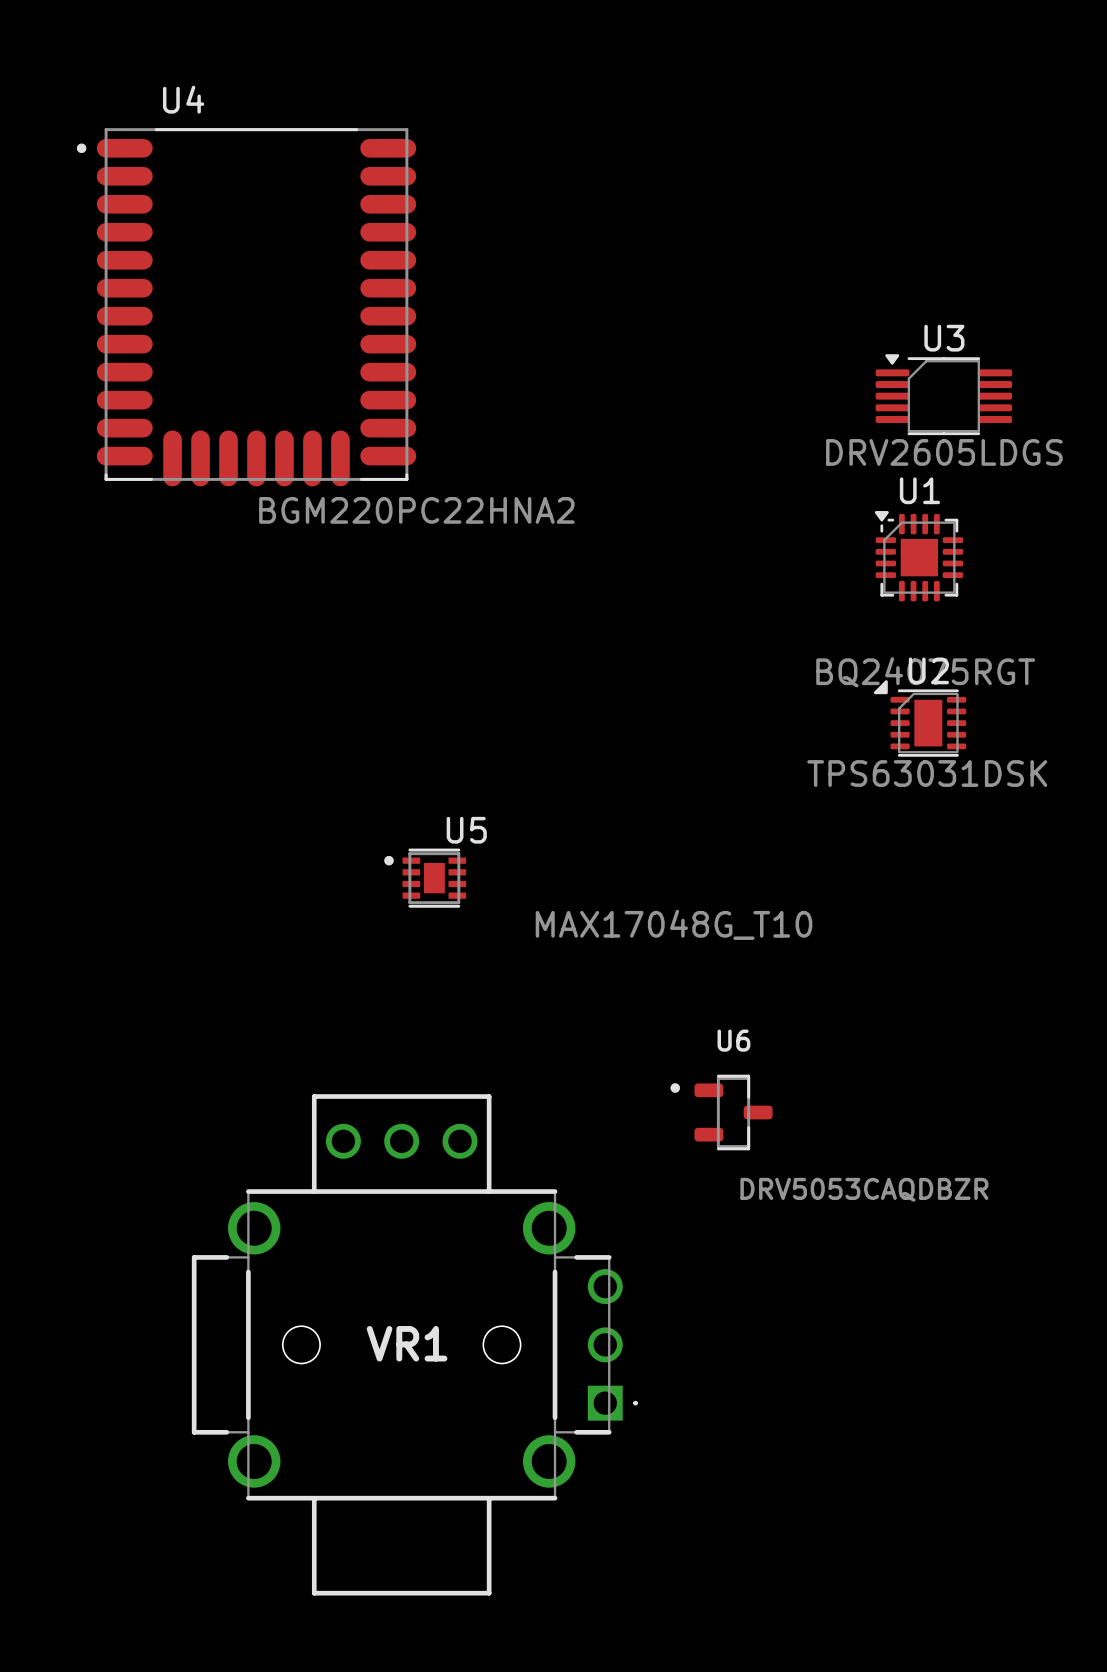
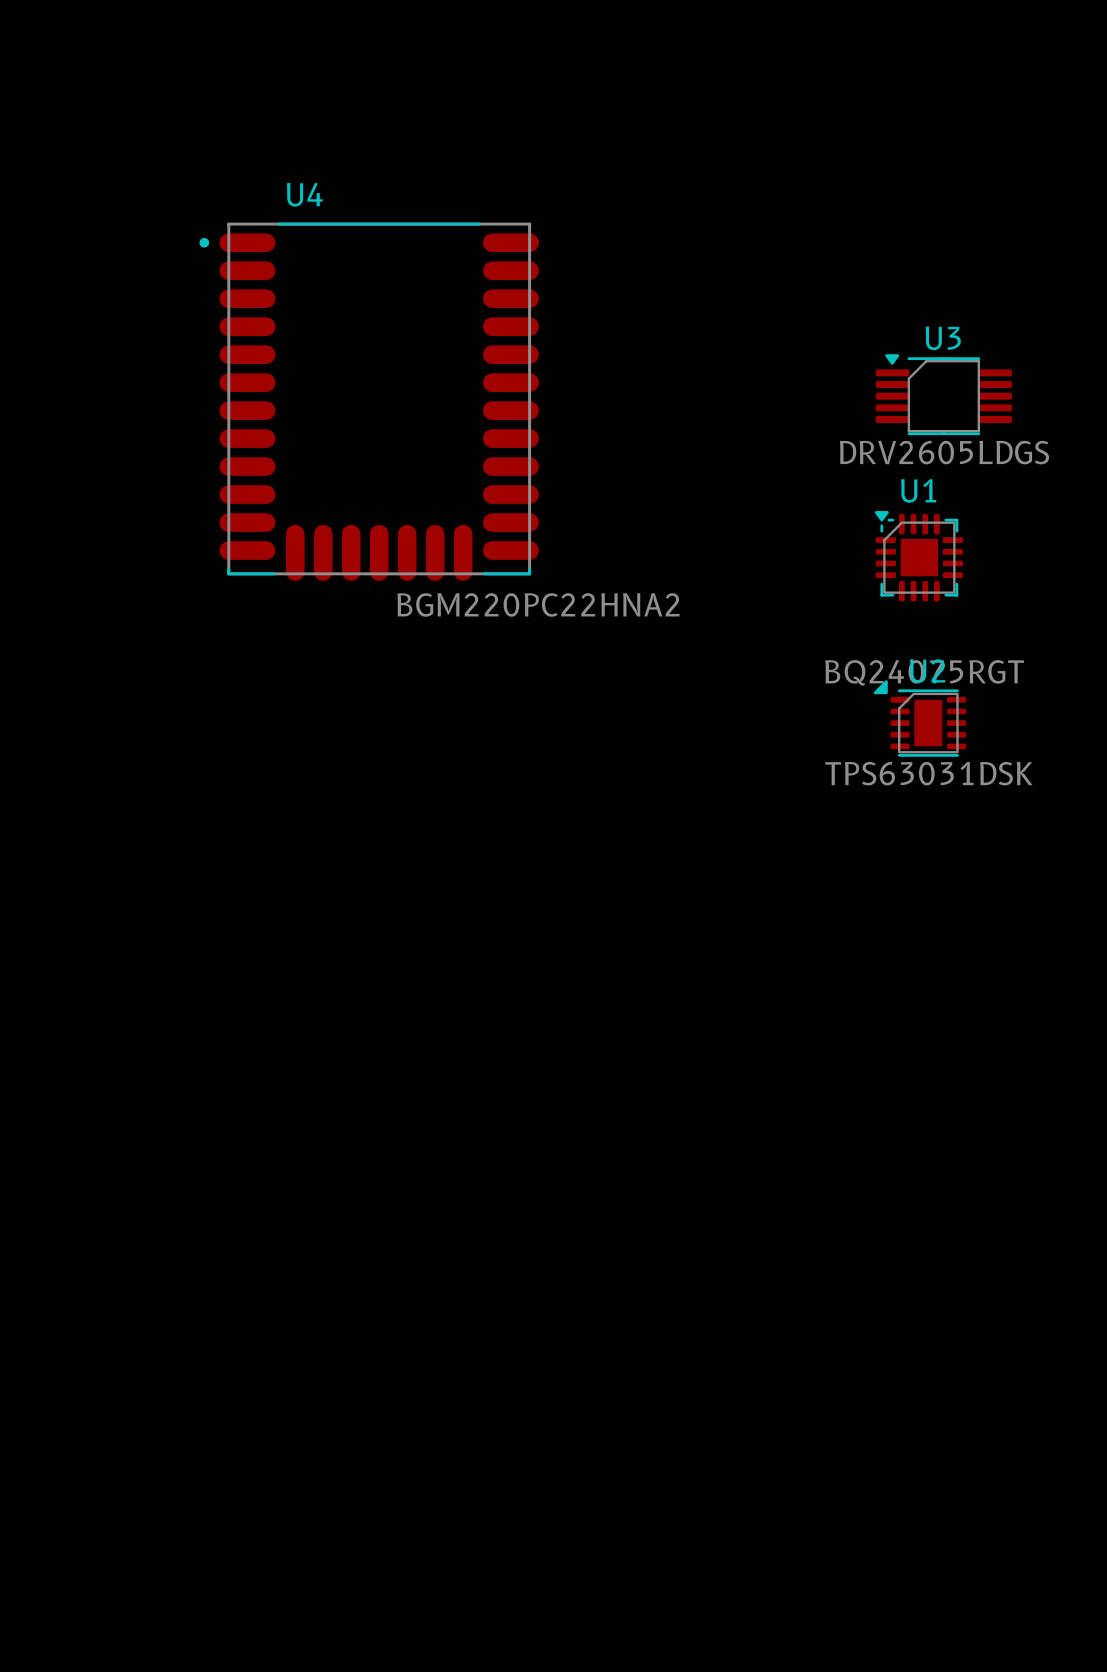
U4 position: (246, 307) -> (369, 401)
U5: MAX17048G_T10 (425, 878) -> none
U6: DRV5053CAQDBZR (721, 1112) -> none
VR1: (414, 1344) -> none

